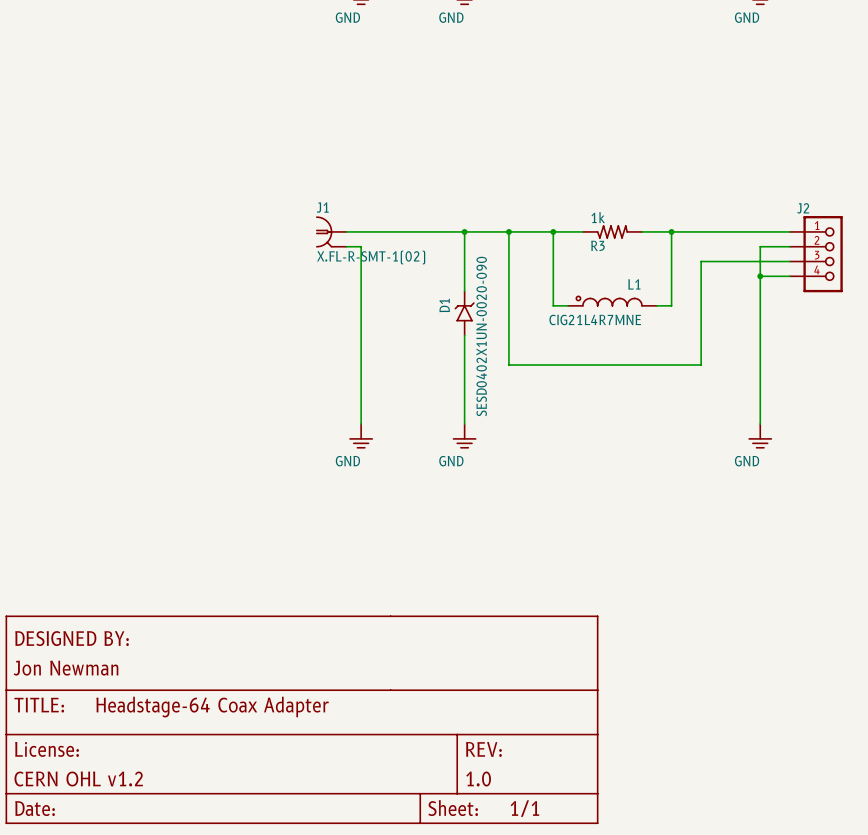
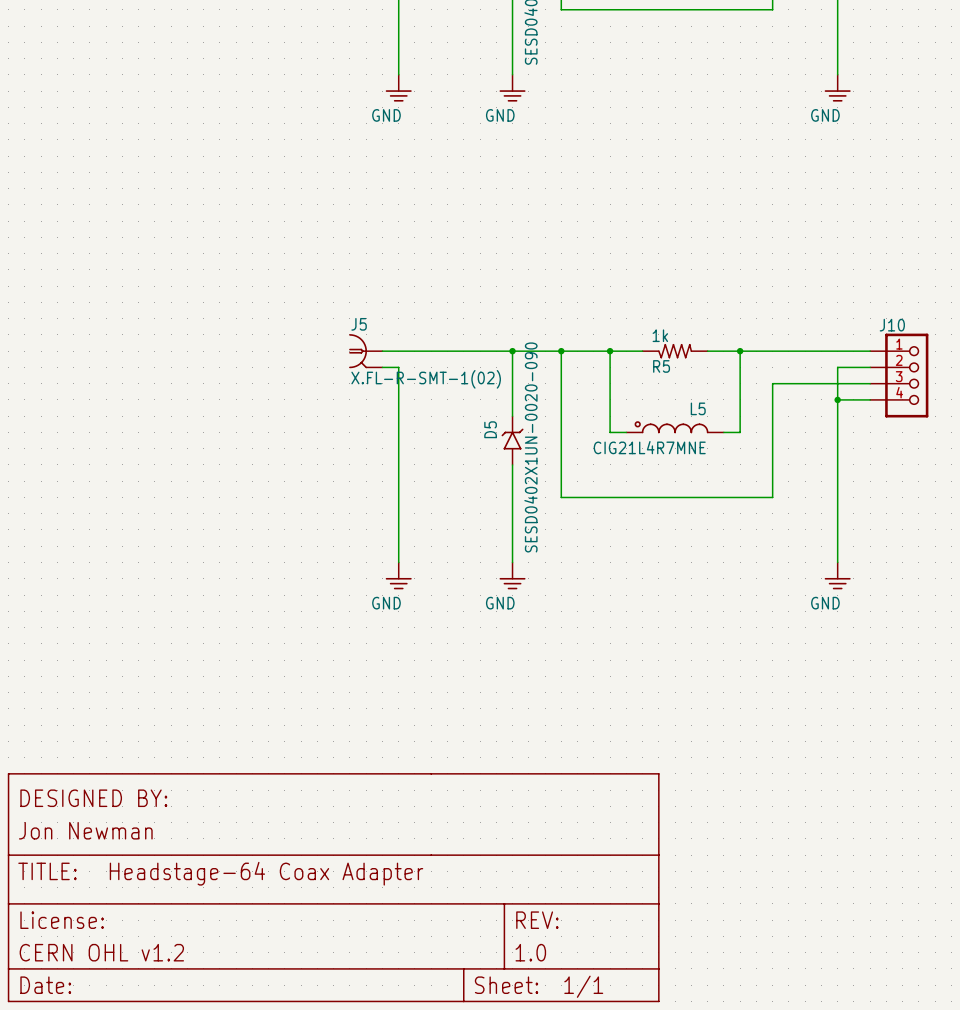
J1 name: J1 (322, 207) -> J5 (359, 324)
J2 name: J2 (803, 208) -> J10 (892, 325)
R3 name: R3 (597, 245) -> R5 (661, 366)
L1 name: L1 (634, 284) -> L5 (698, 408)
D1 name: D1 (444, 305) -> D5 (490, 429)

